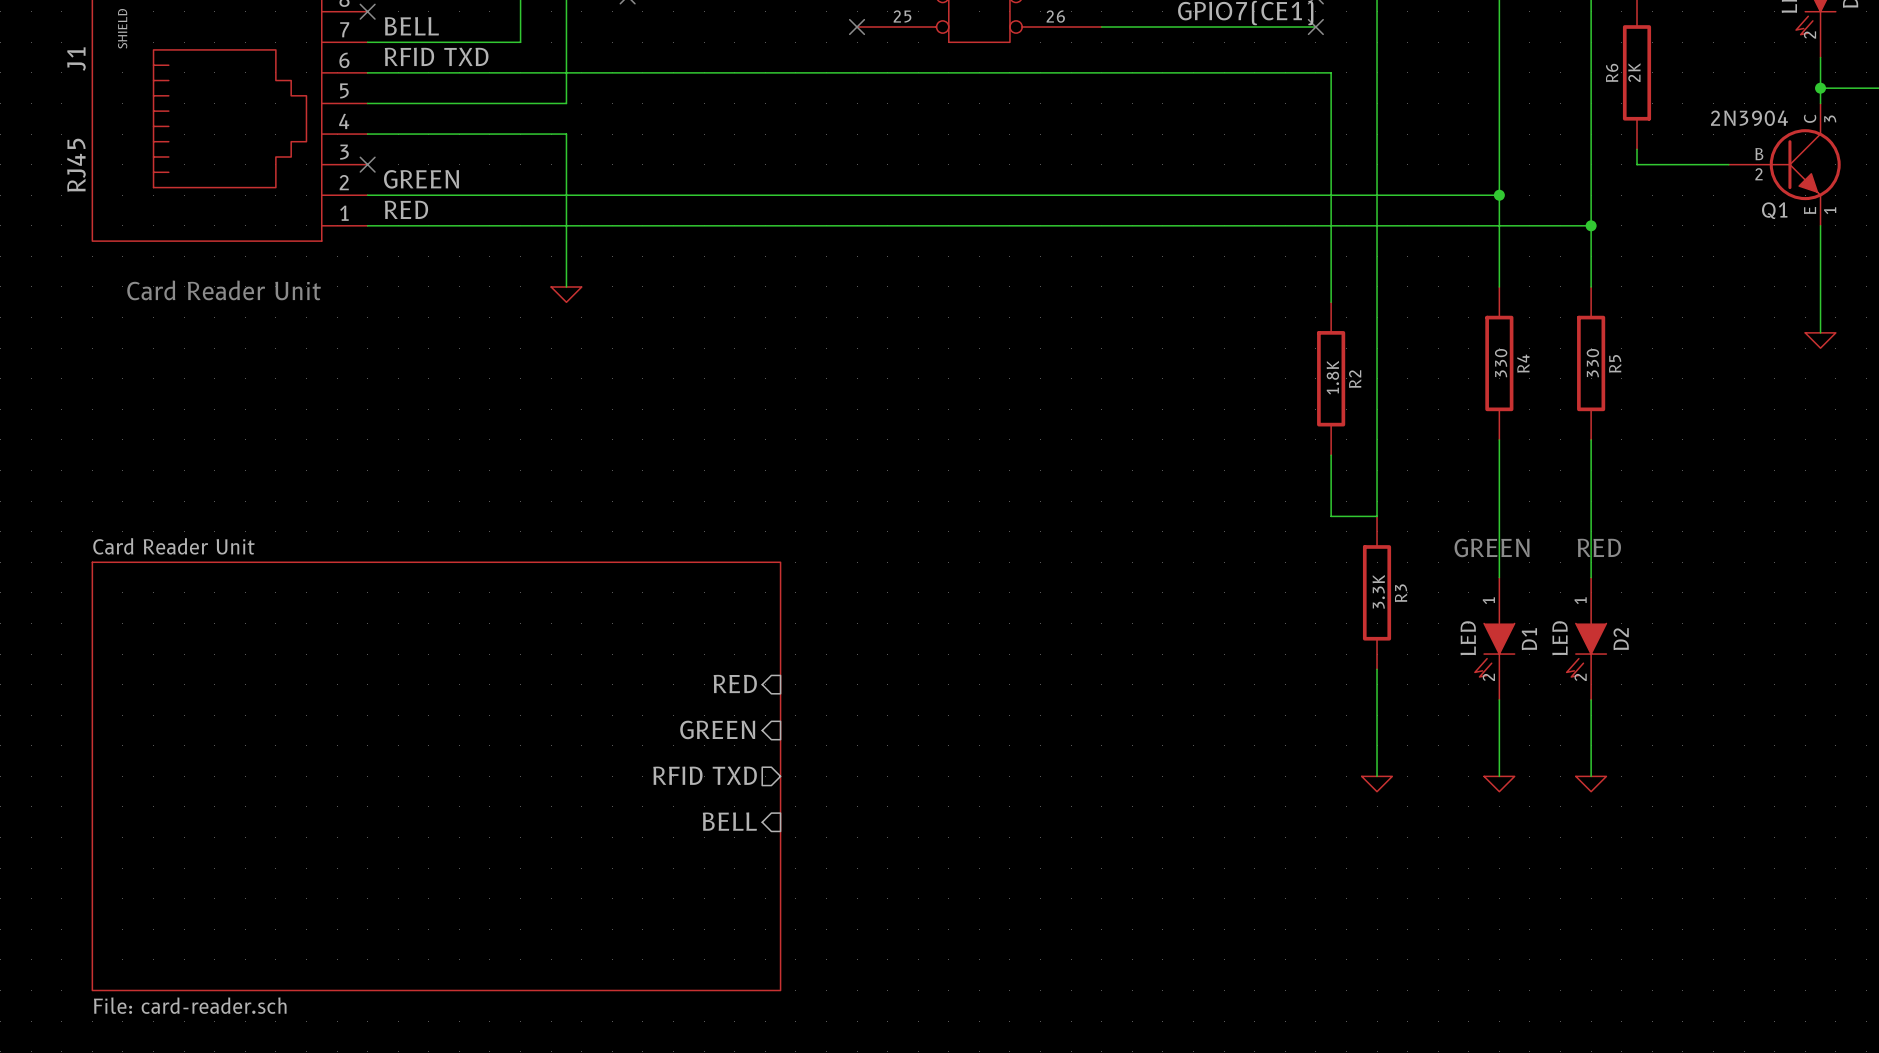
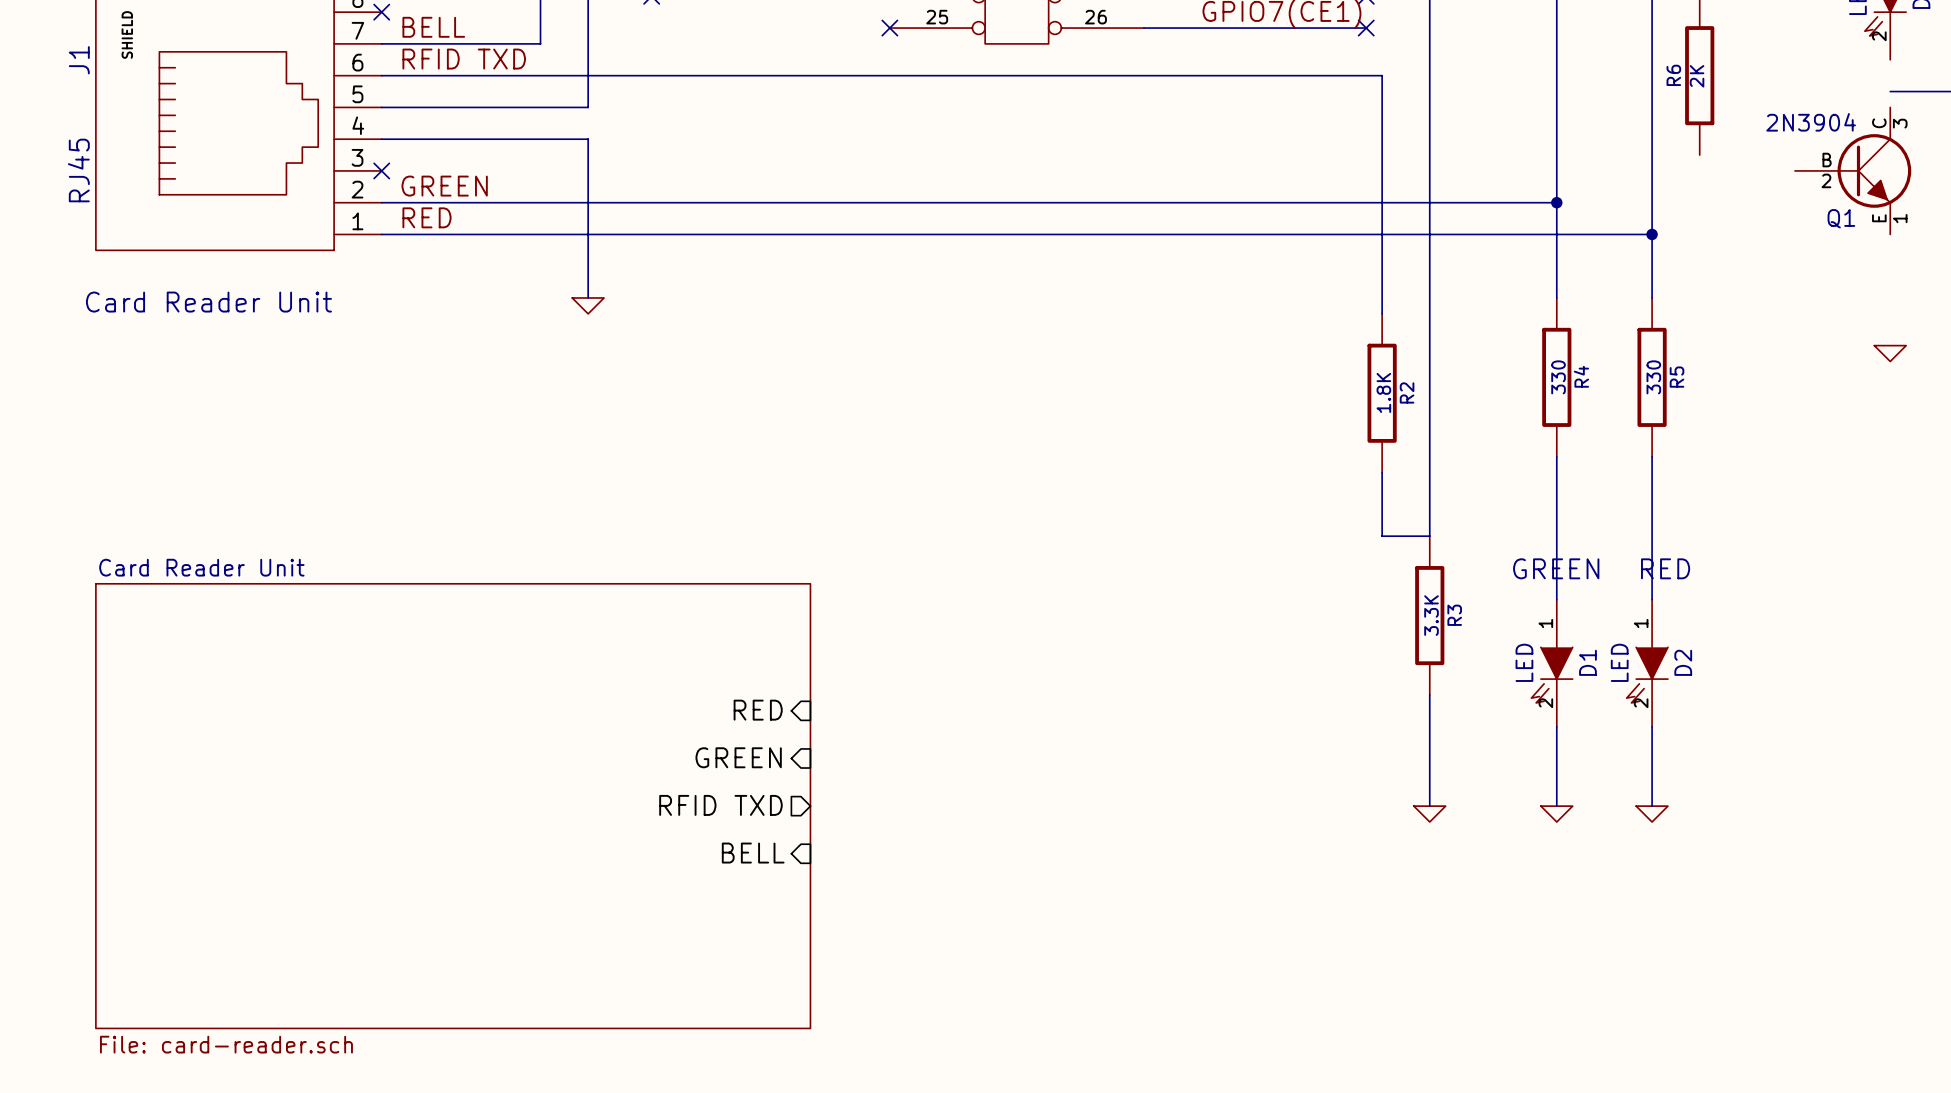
wire: (1820, 57) (1820, 103) -> none
junction: (1820, 88) -> none
wire: (1637, 149) (1637, 164) (1728, 164) -> none
wire: (1820, 225) (1820, 332) -> none

